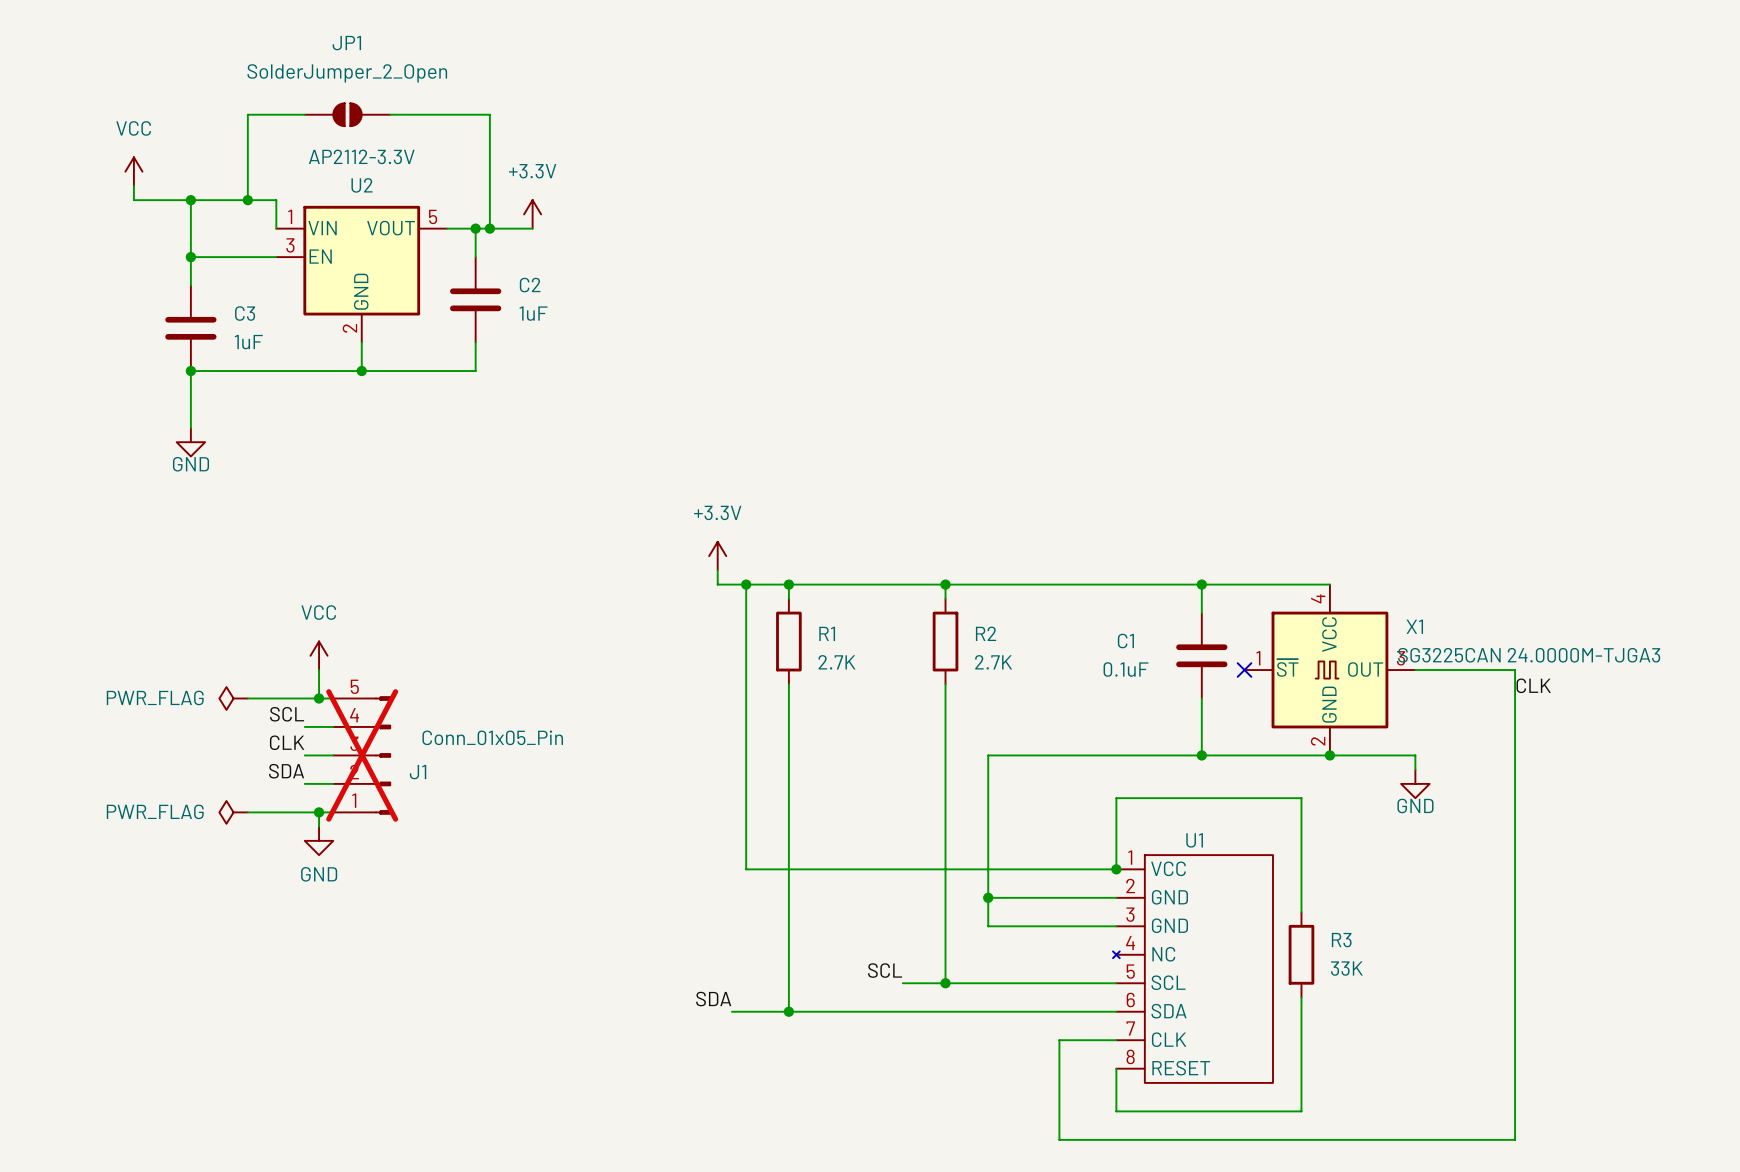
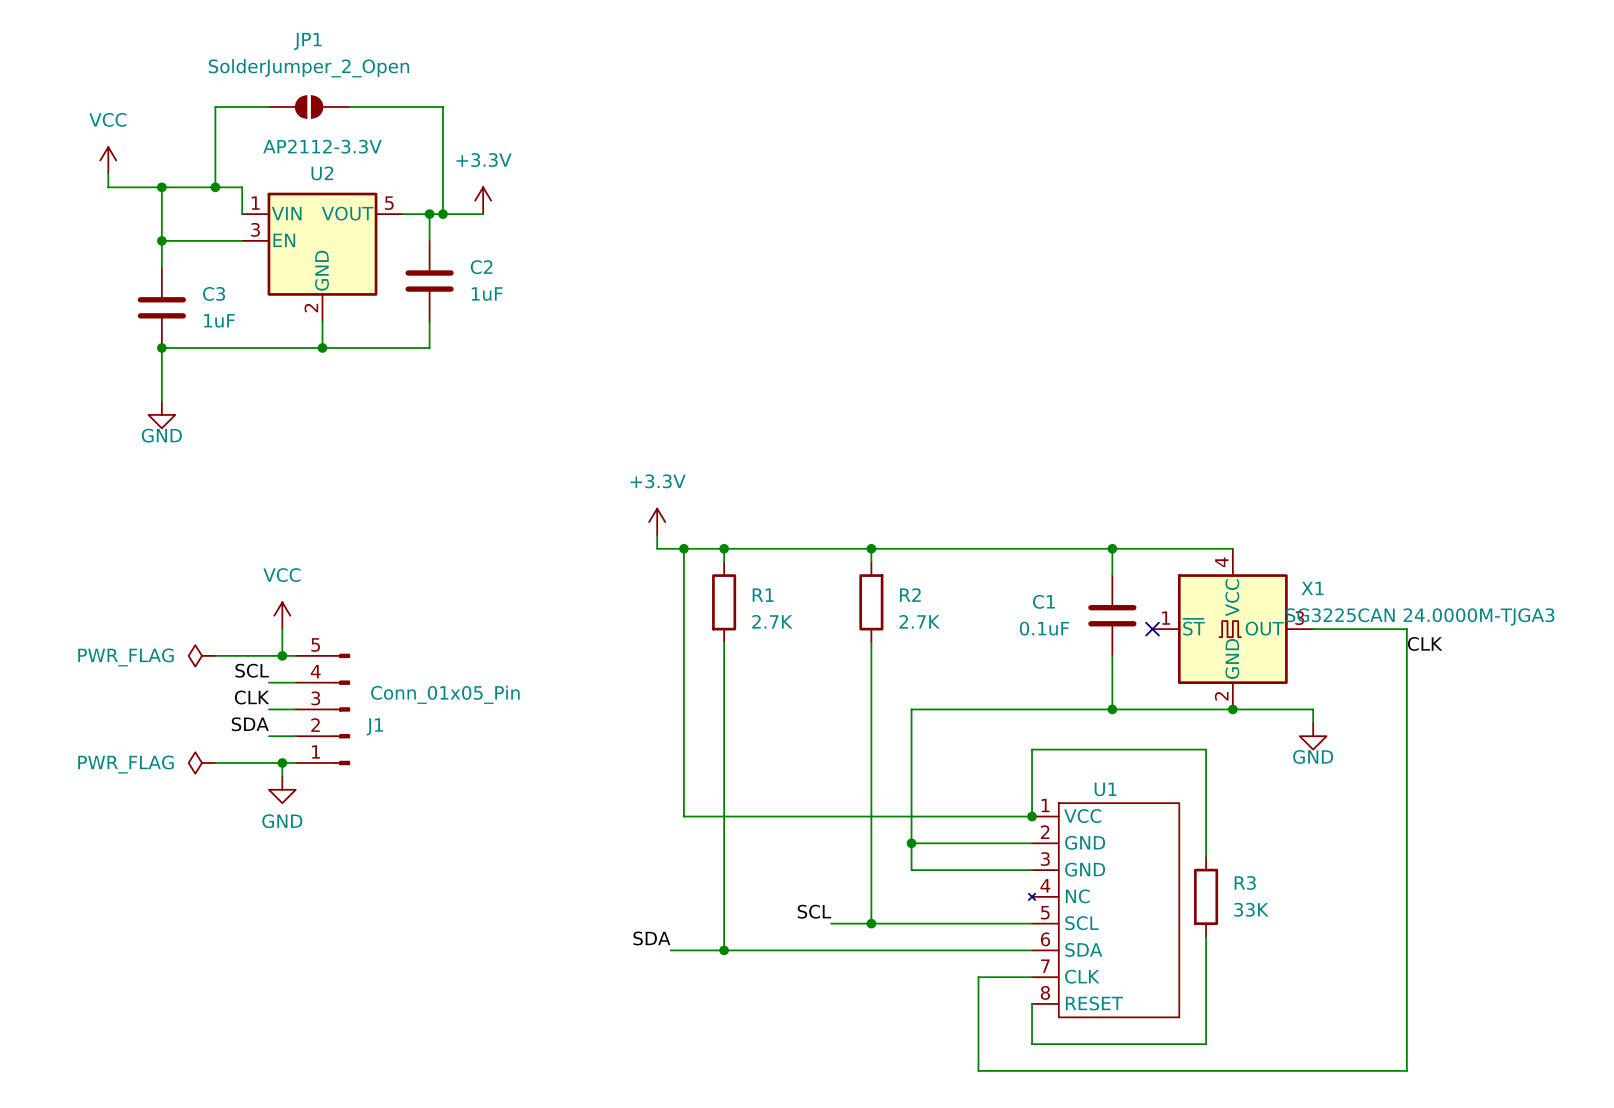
J1 do-not-place cross: (362, 755) -> none

